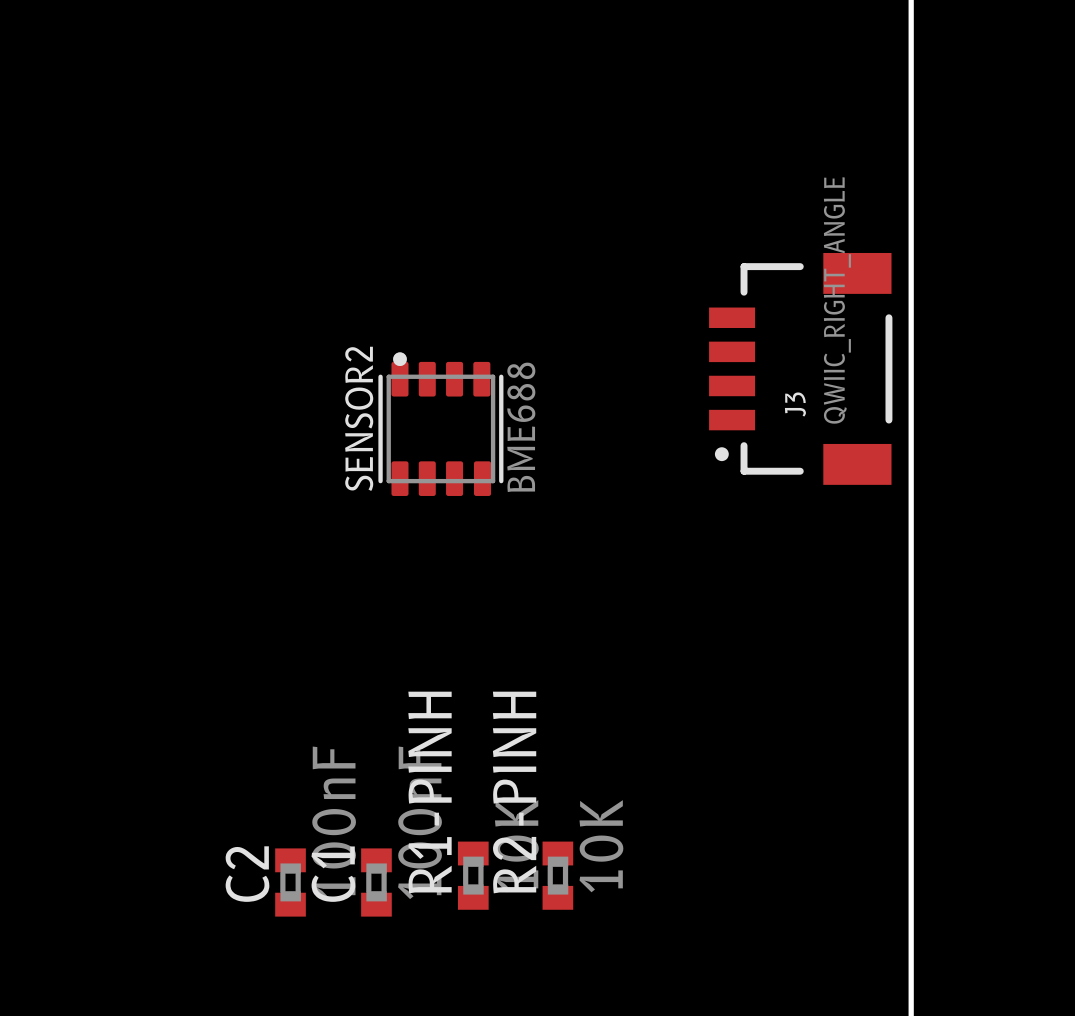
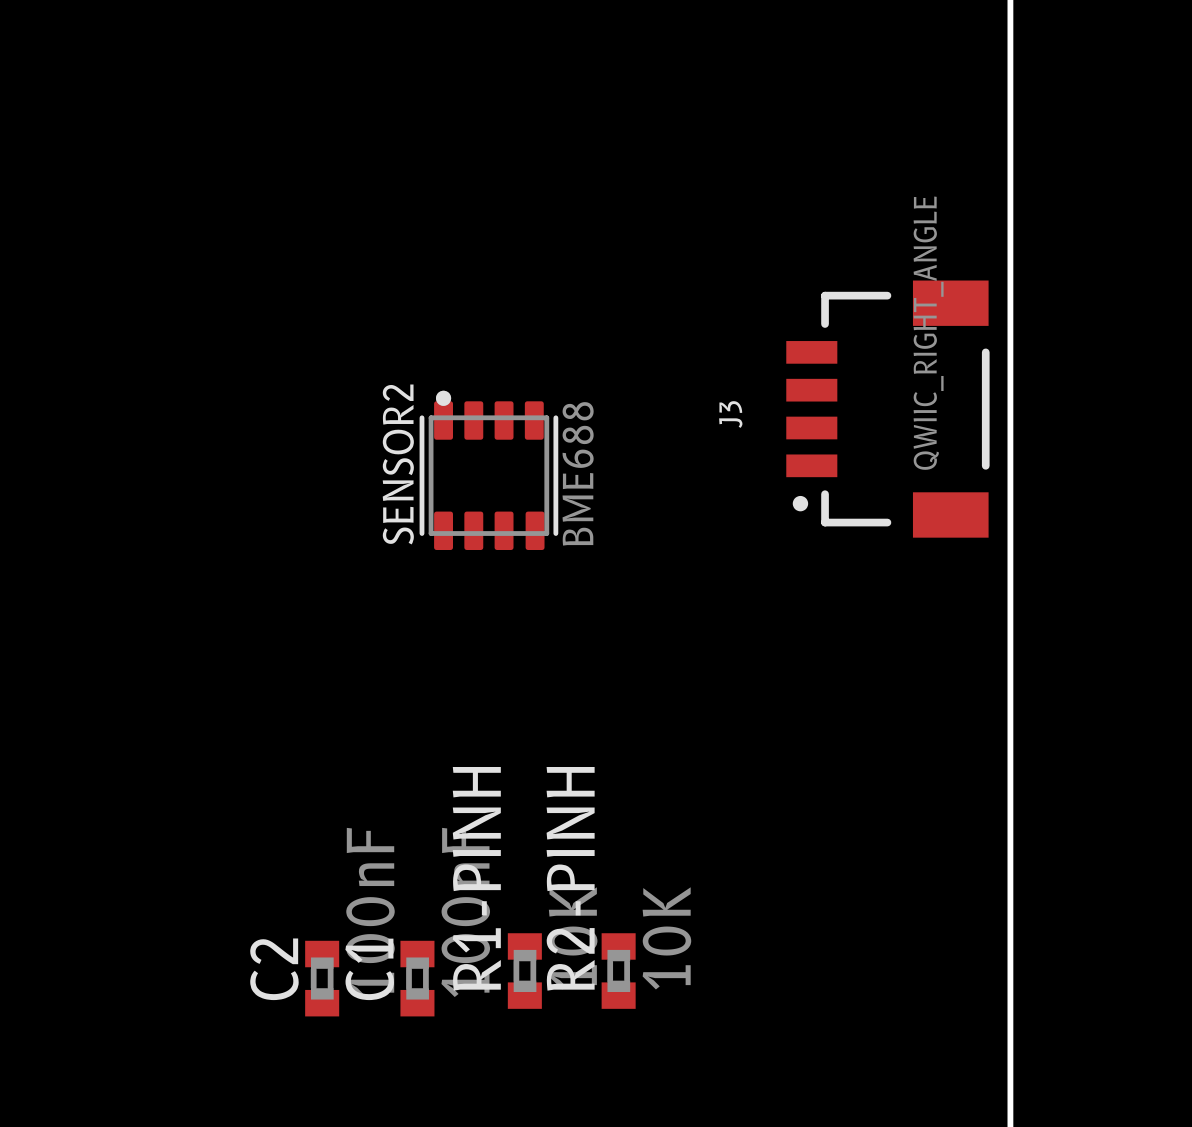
J3 name position: J3 (795, 404) -> J3 (730, 414)

